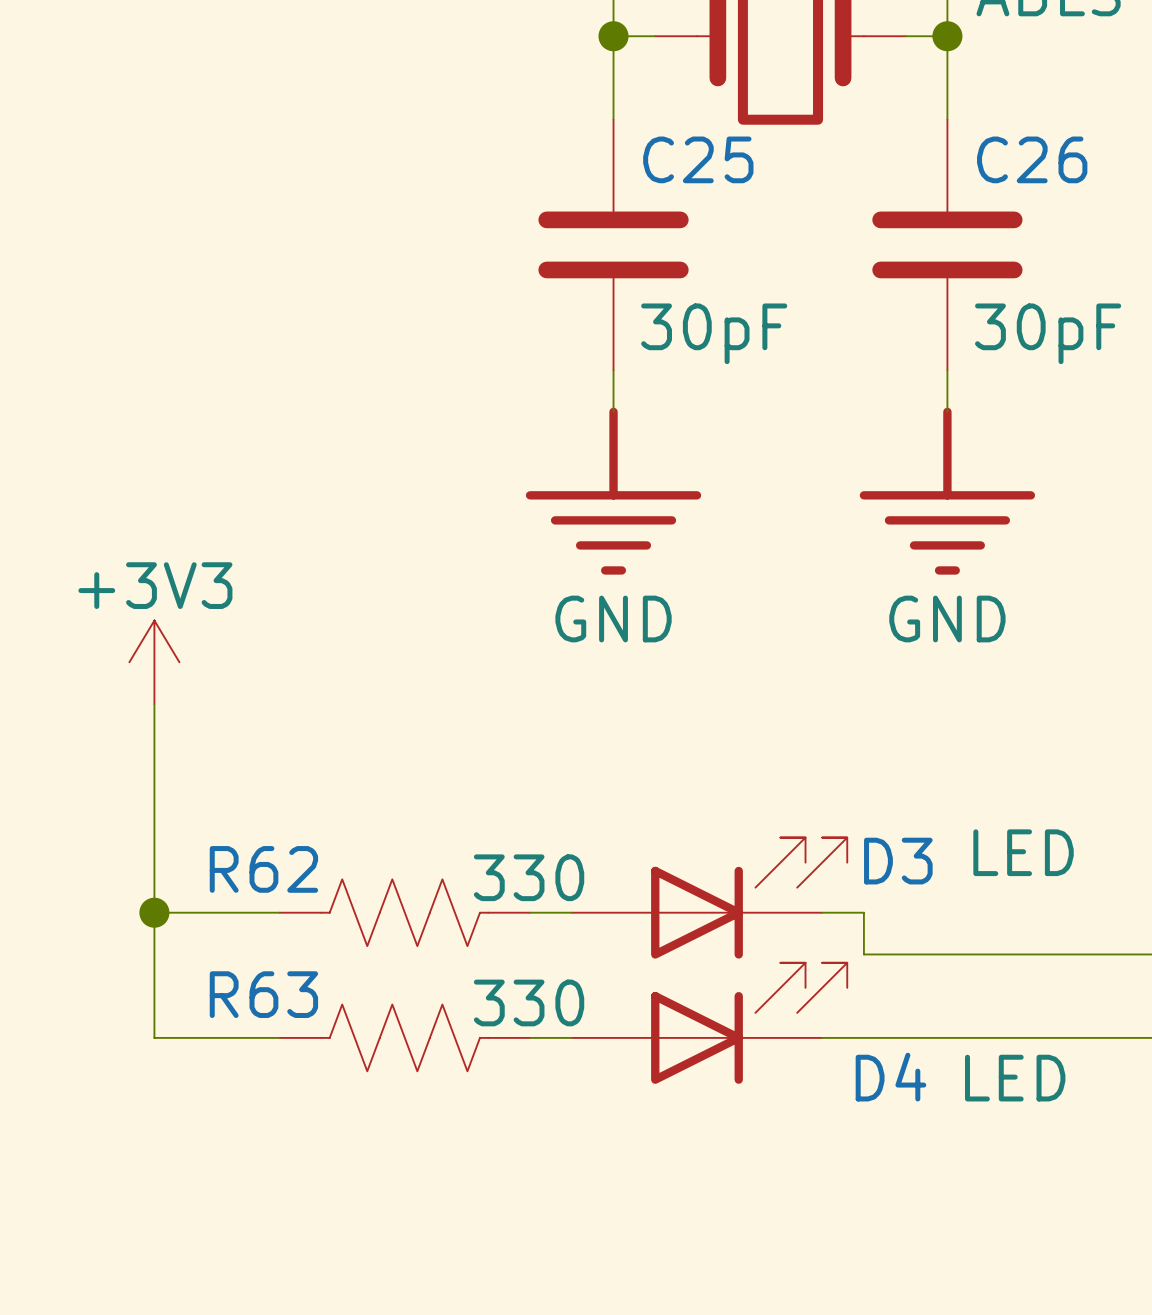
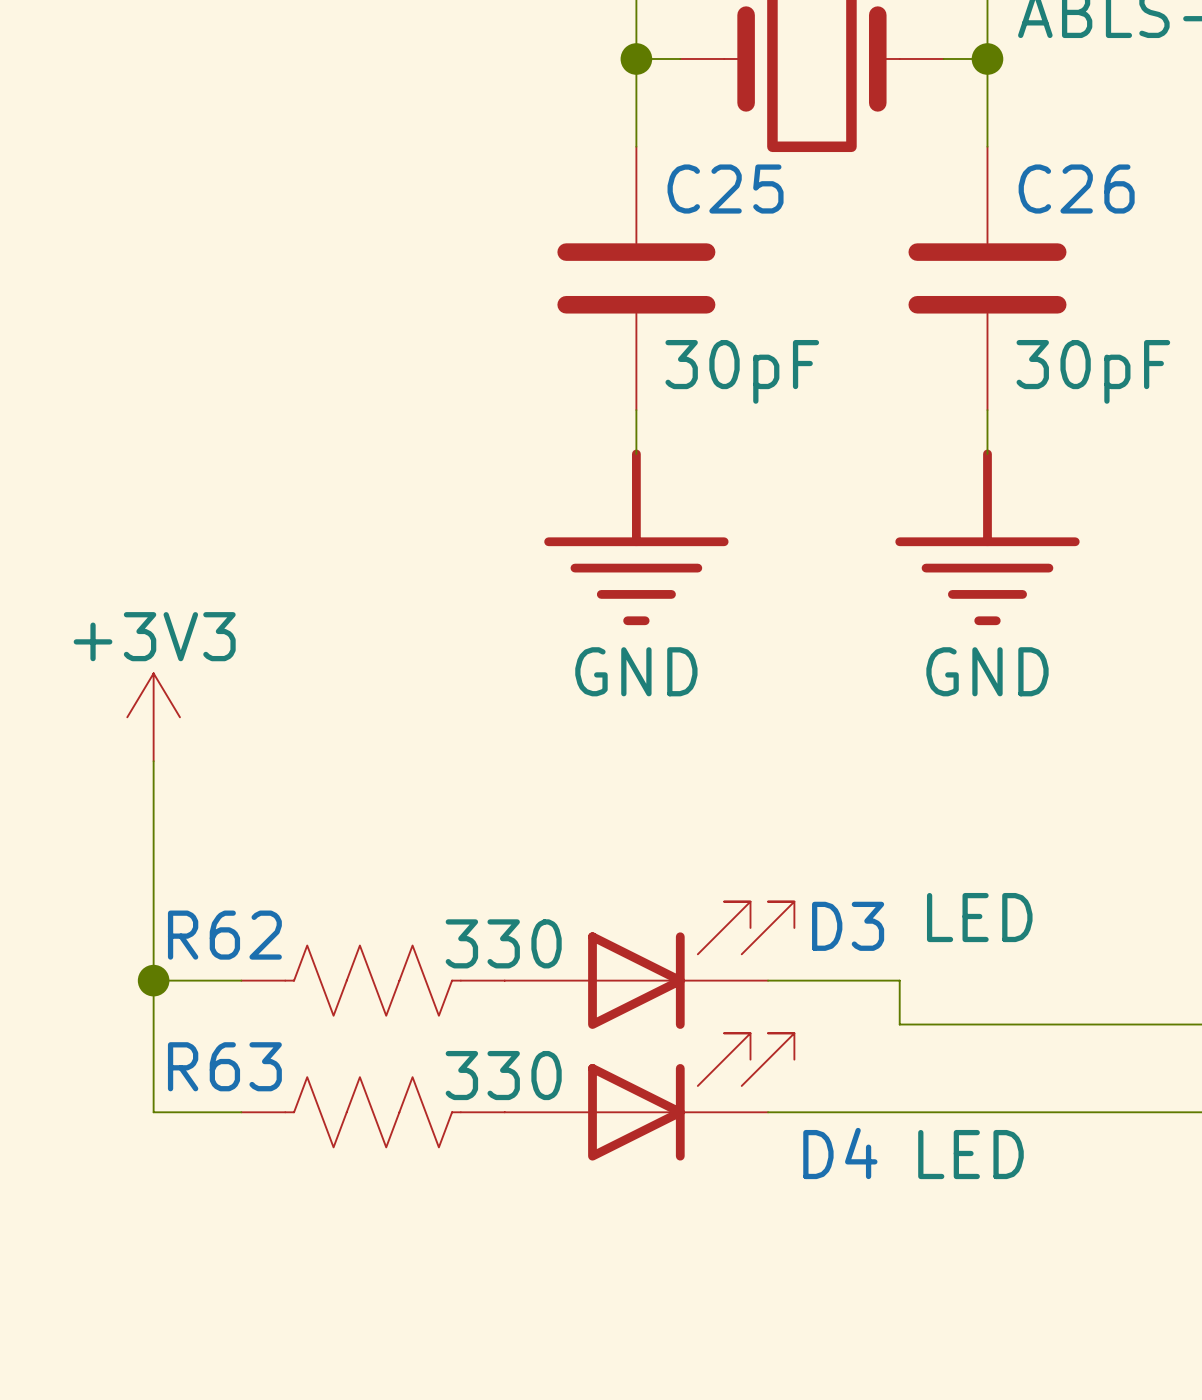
D3 position: (709, 898) -> (649, 965)
R62 position: (404, 912) -> (373, 980)
D4 position: (709, 1023) -> (649, 1096)
R63 position: (404, 1037) -> (373, 1112)

